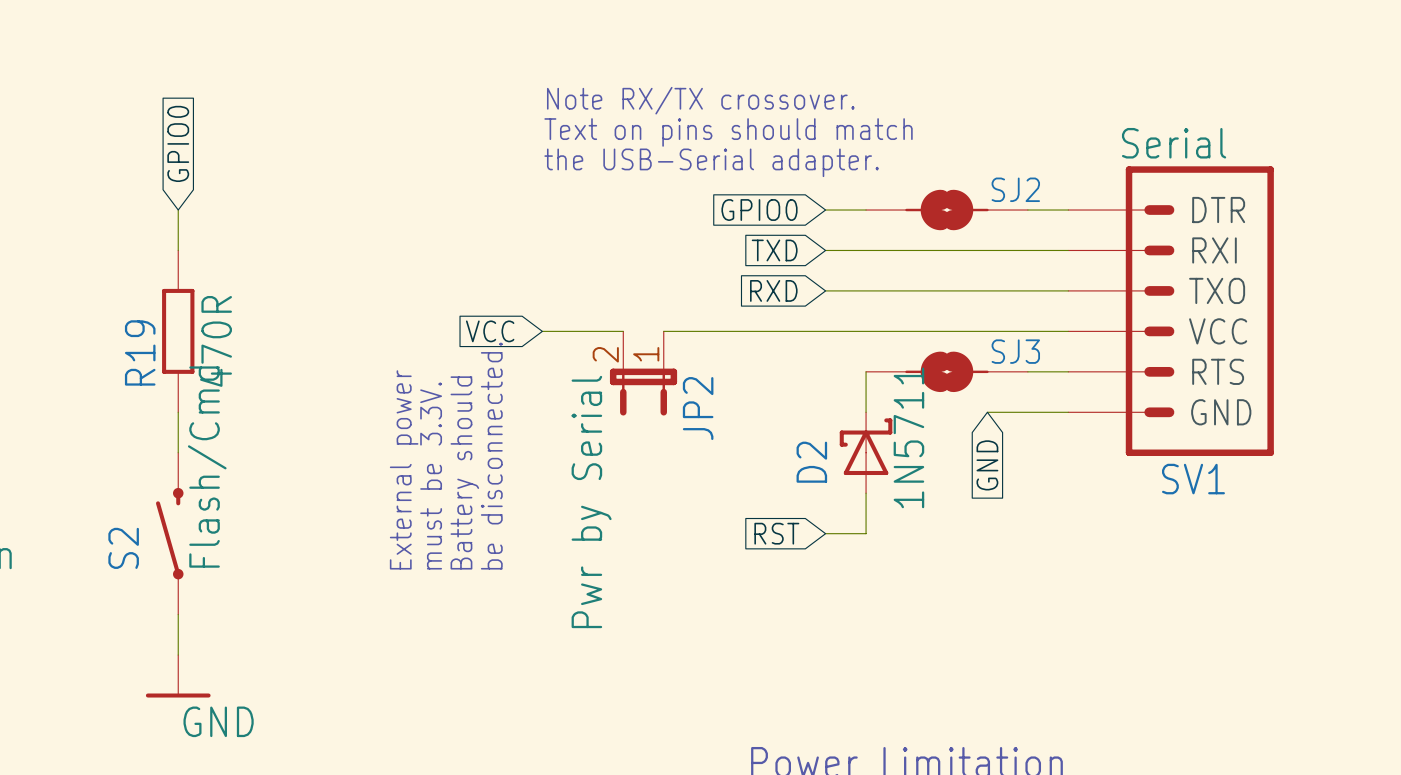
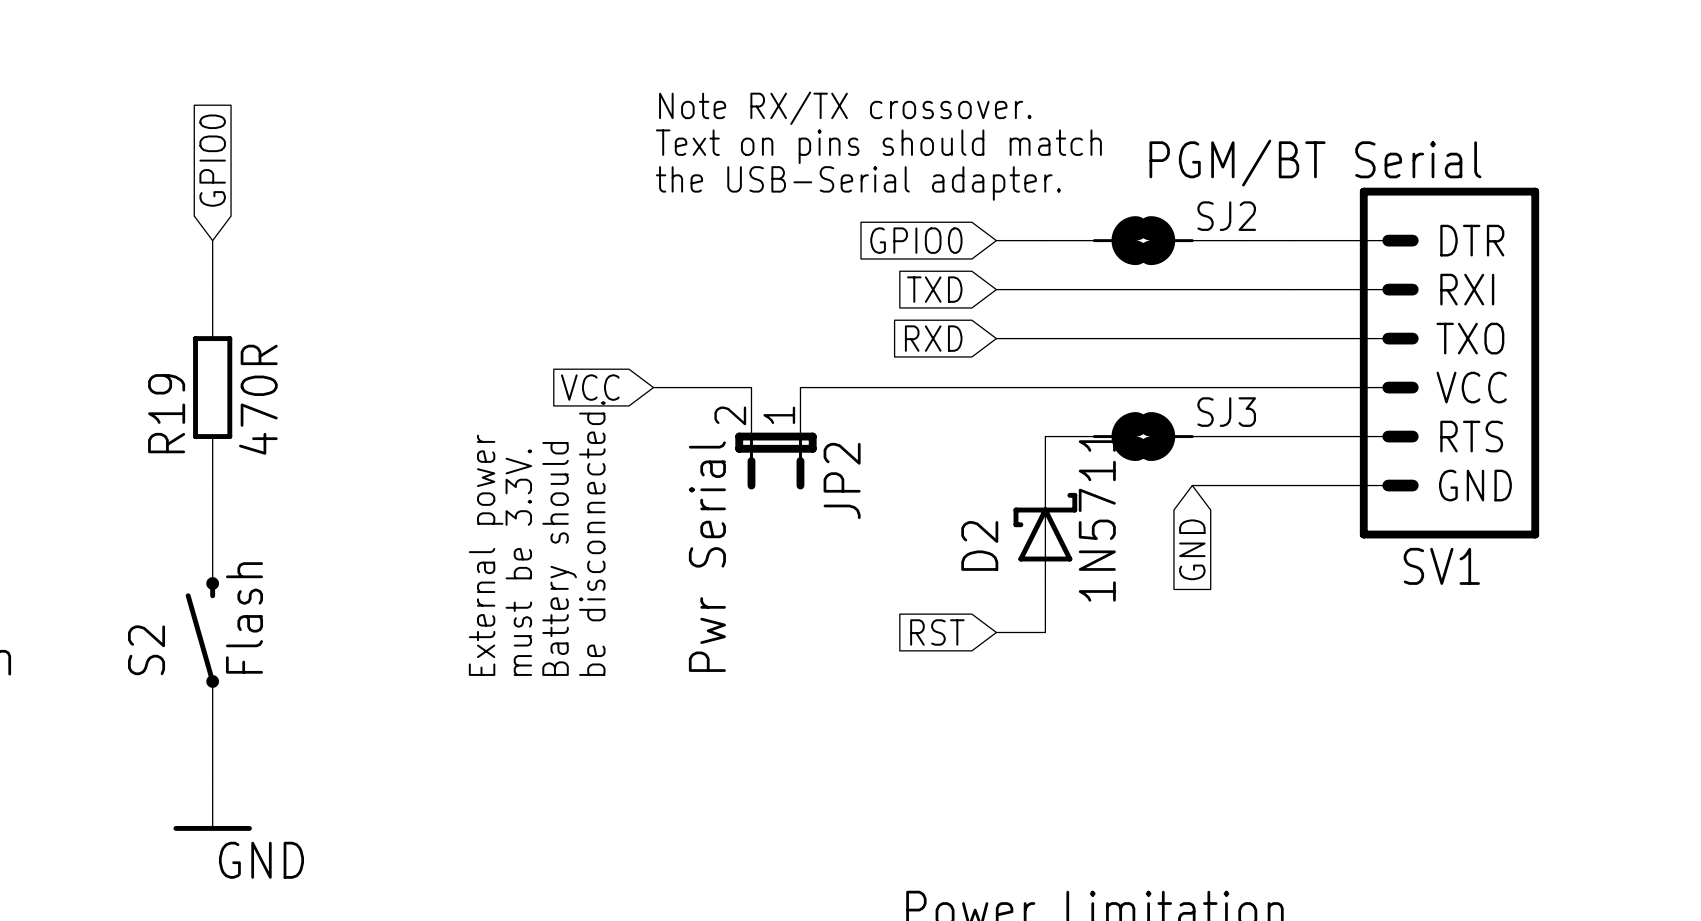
SV1 value: Serial (1174, 143) -> PGM/BT Serial (1315, 163)
S2 value: Flash/Cmd (207, 467) -> Flash (244, 617)
JP2 value: Pwr by Serial (591, 501) -> Pwr Serial (707, 556)

